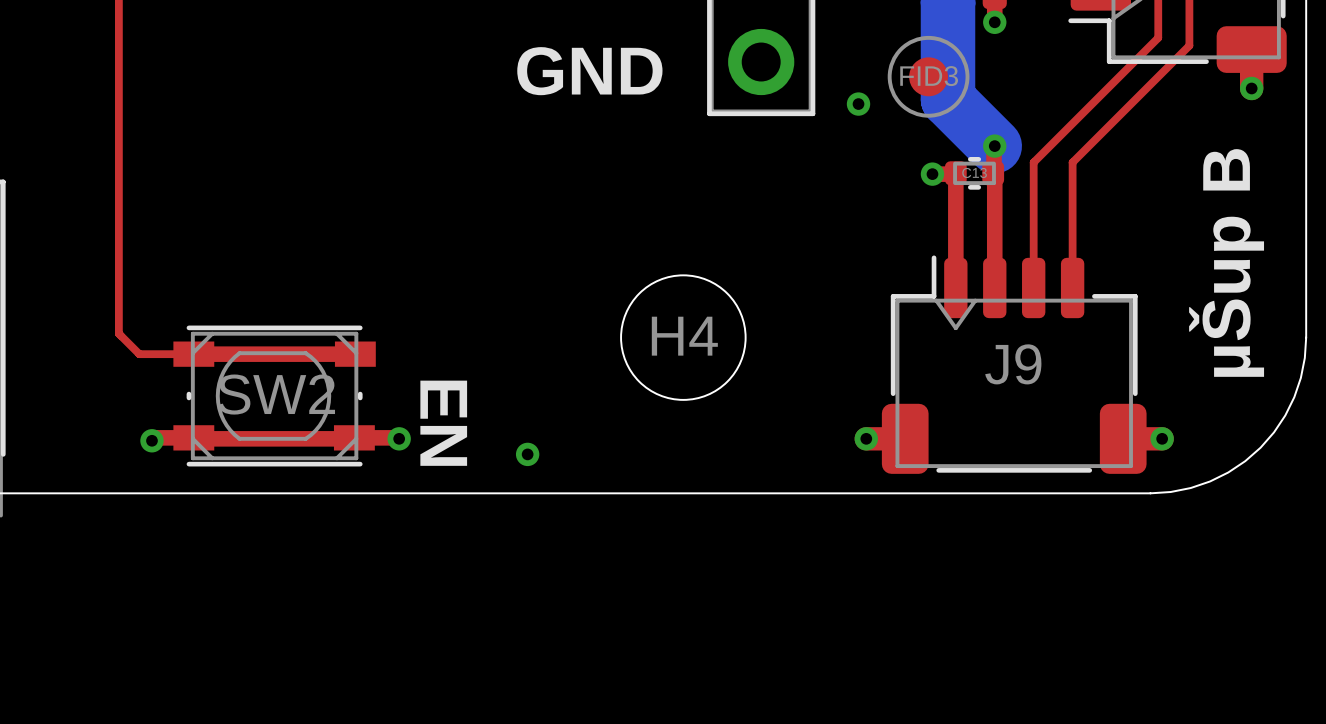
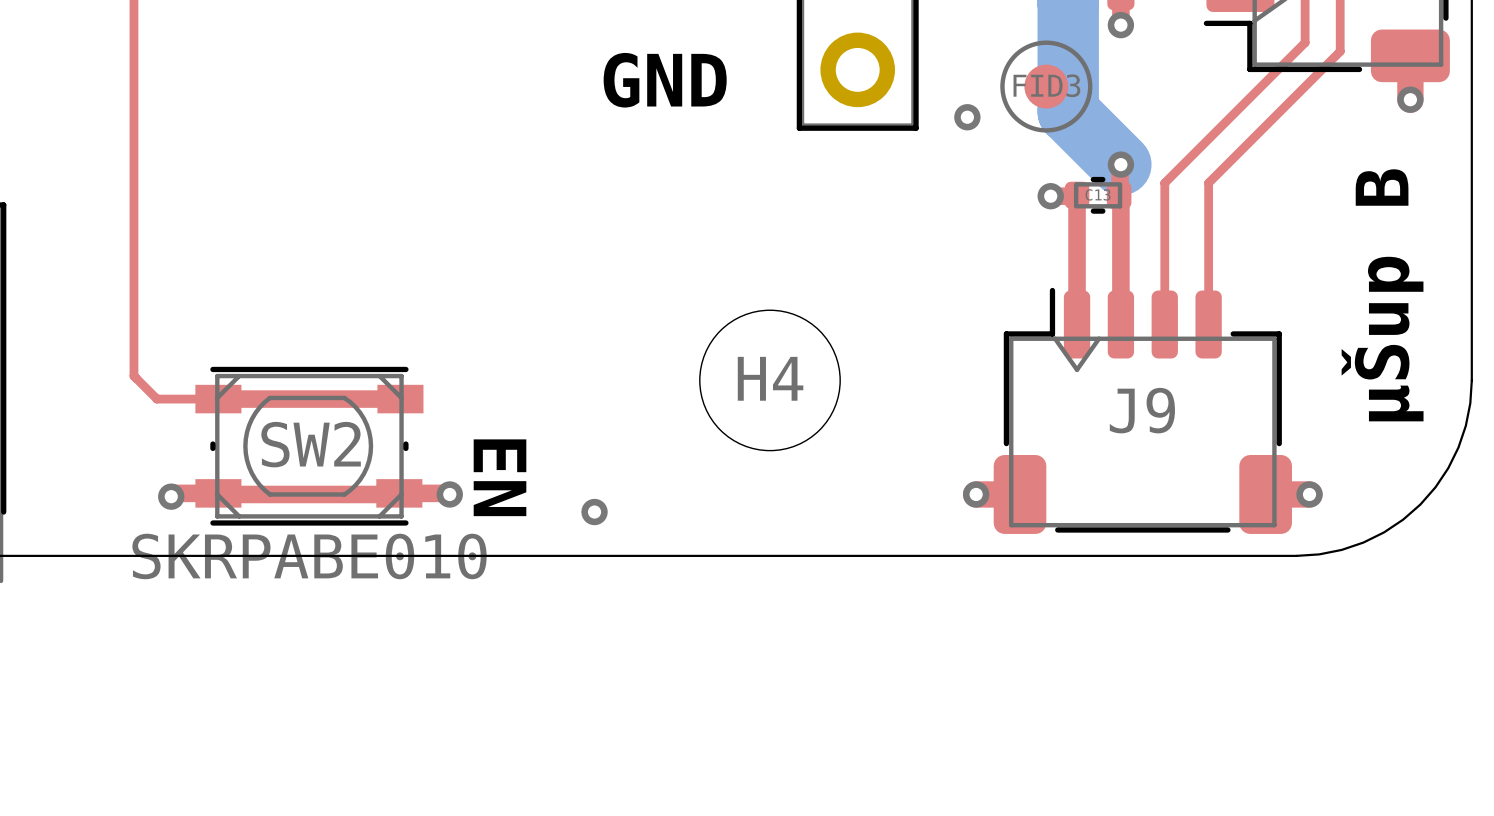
SW2 value: none -> SKRPABE010 (309, 556)

